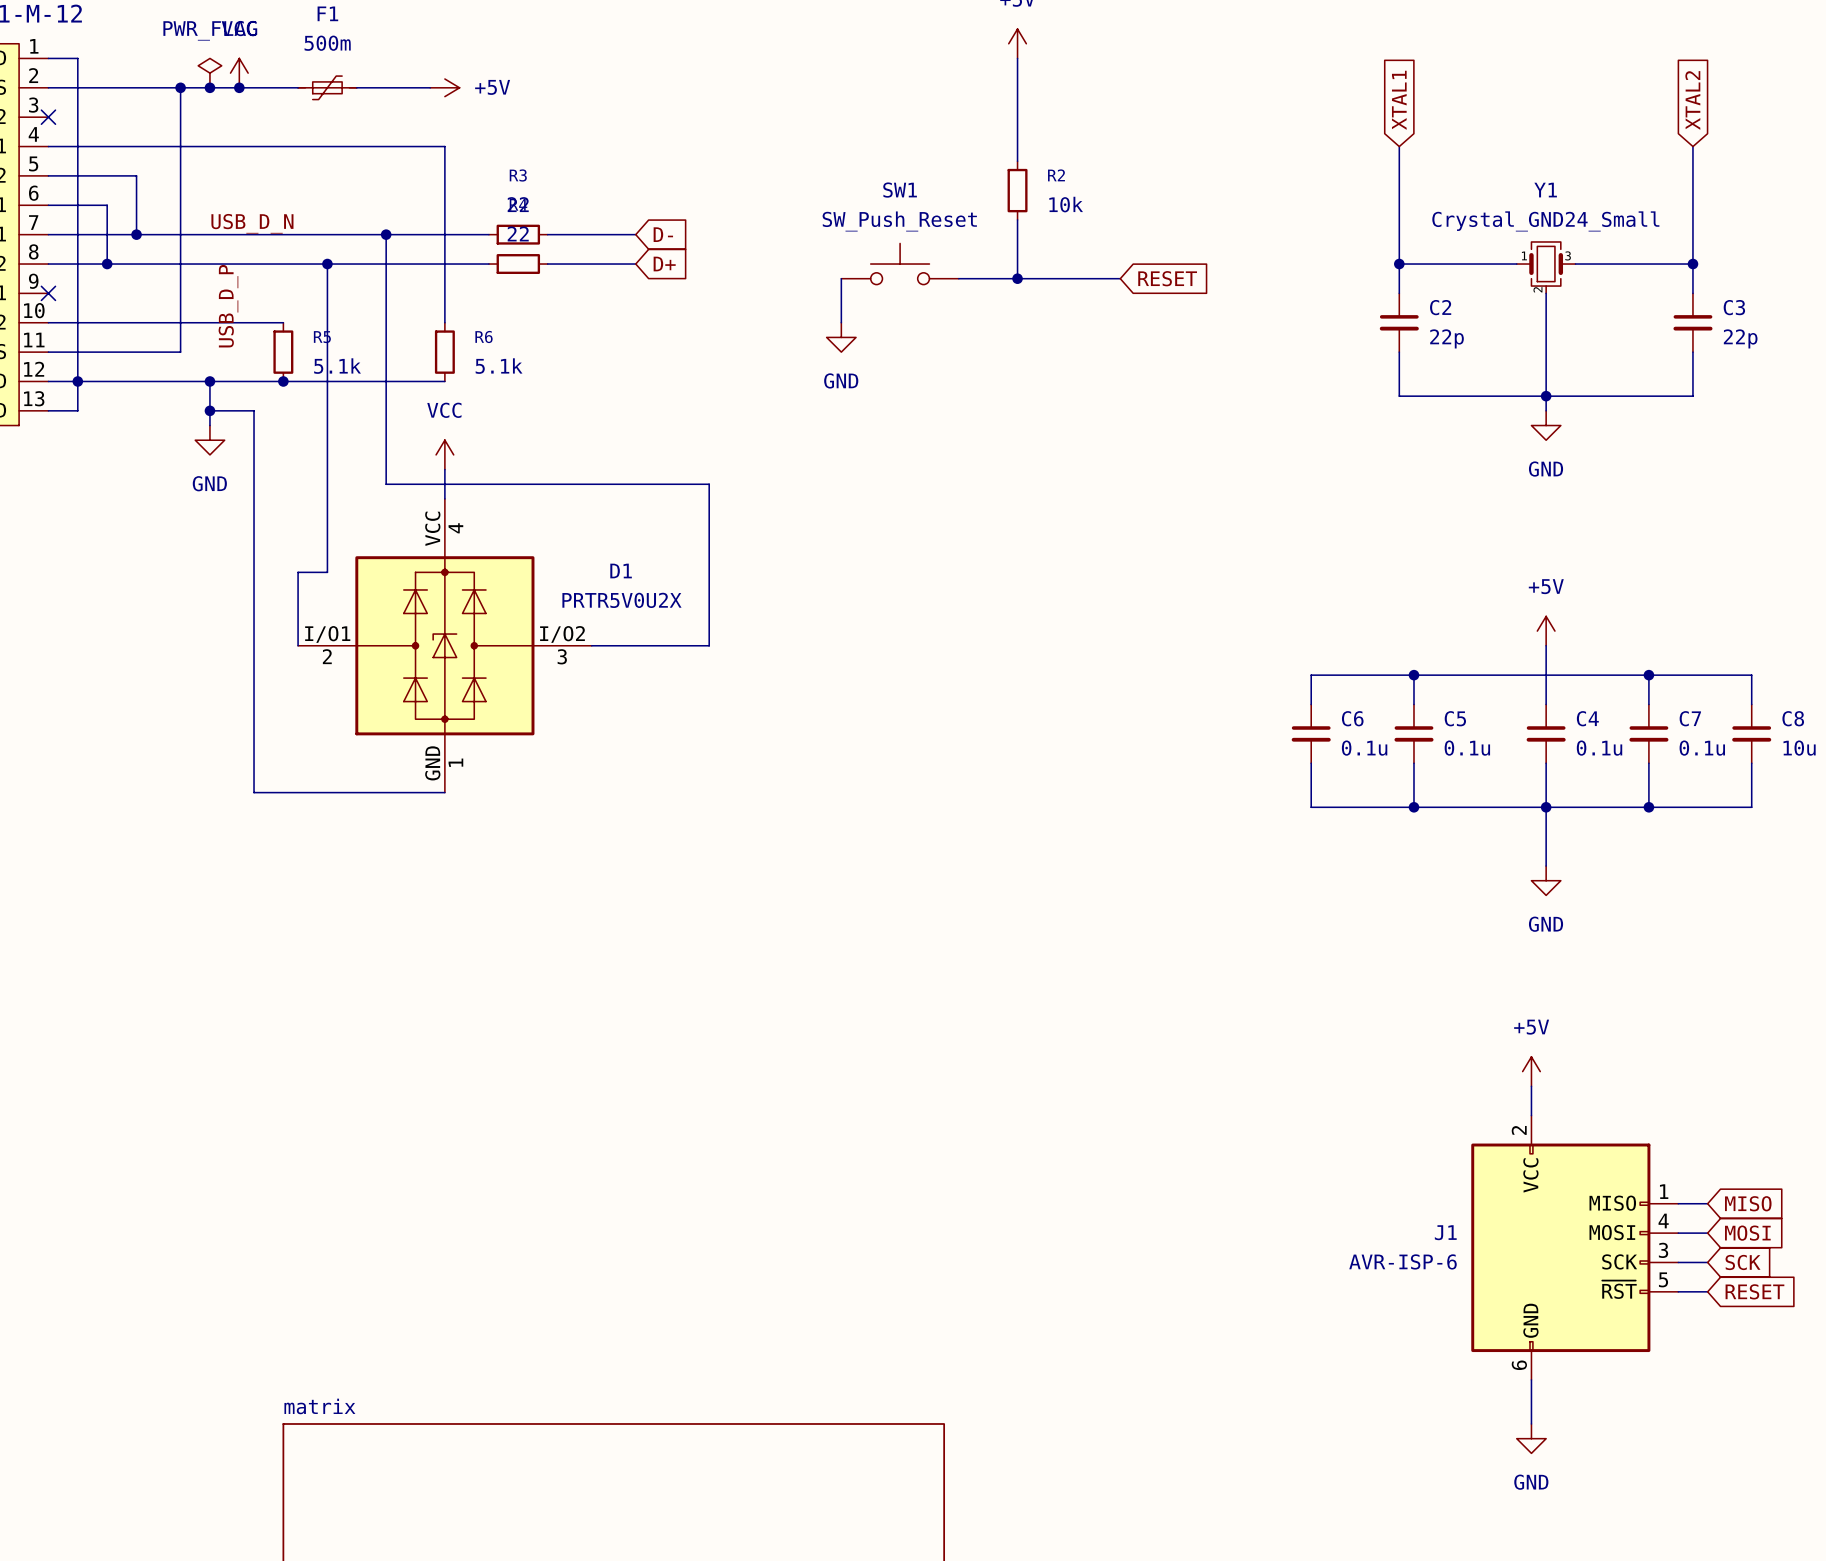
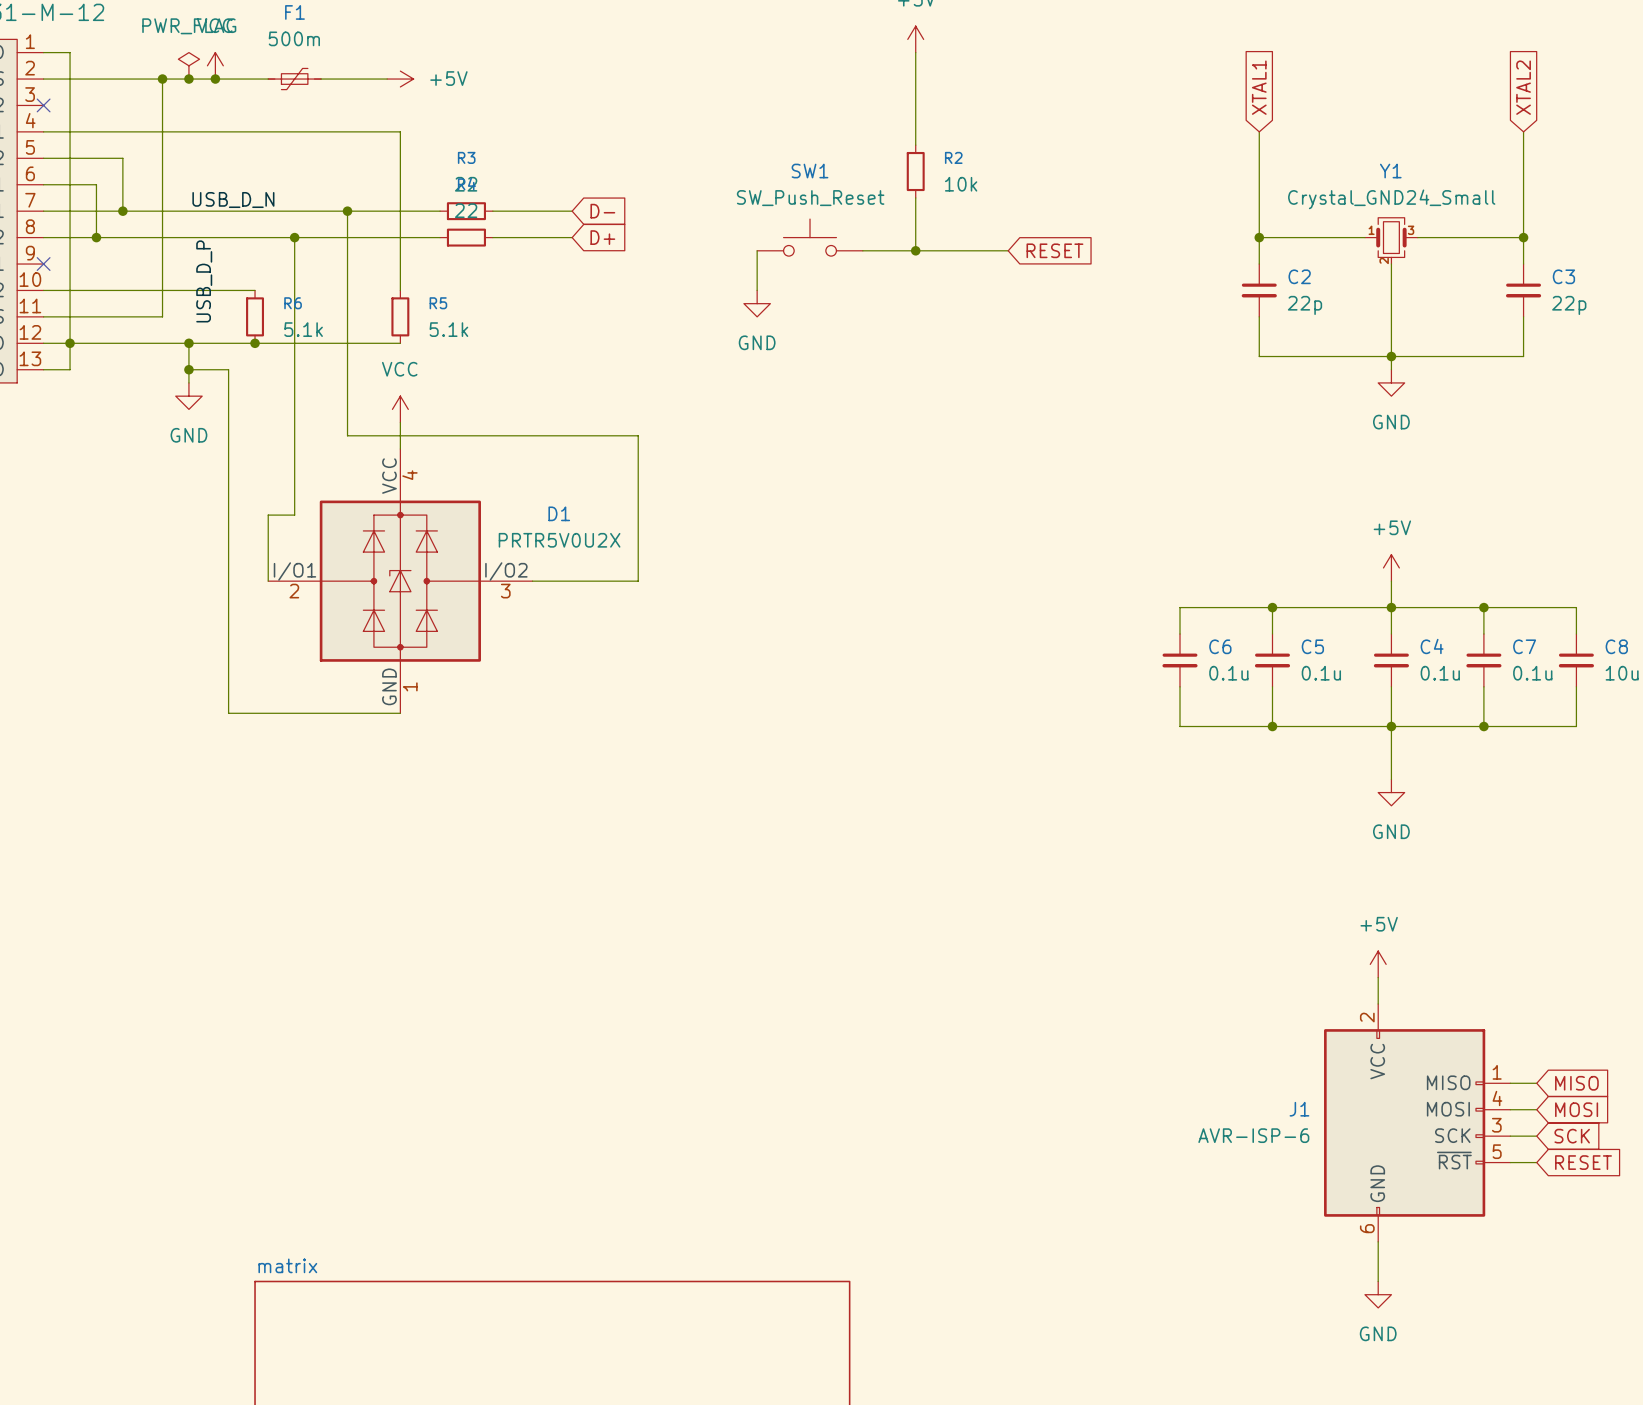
R5 name: R5 (322, 337) -> R6 (293, 303)
R6 name: R6 (484, 337) -> R5 (438, 303)
junction: none -> (1391, 607)

